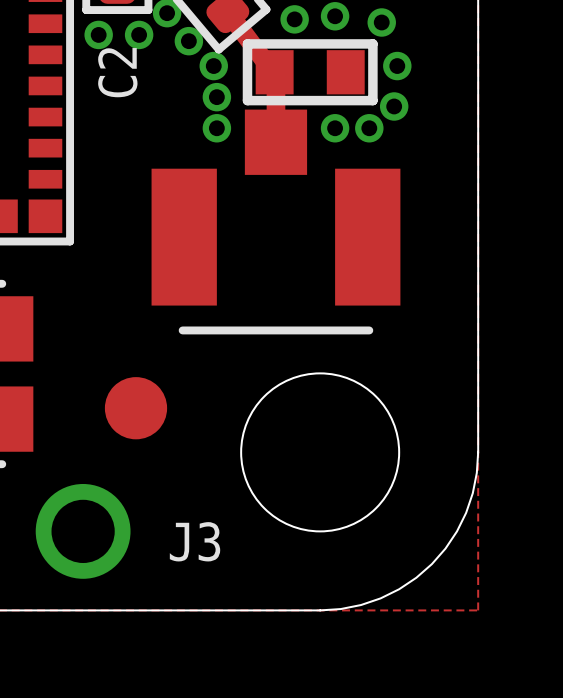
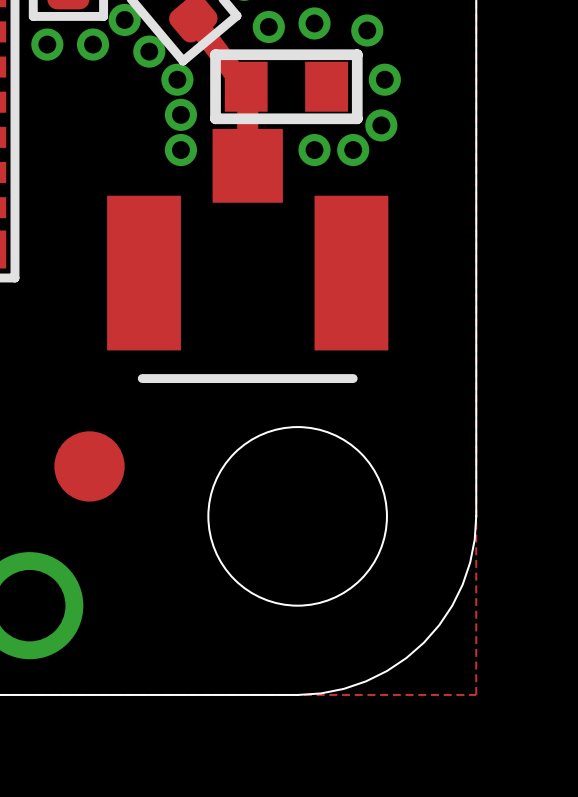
C2 name: C2 (117, 72) -> none
J3 name: J3 (195, 541) -> none

